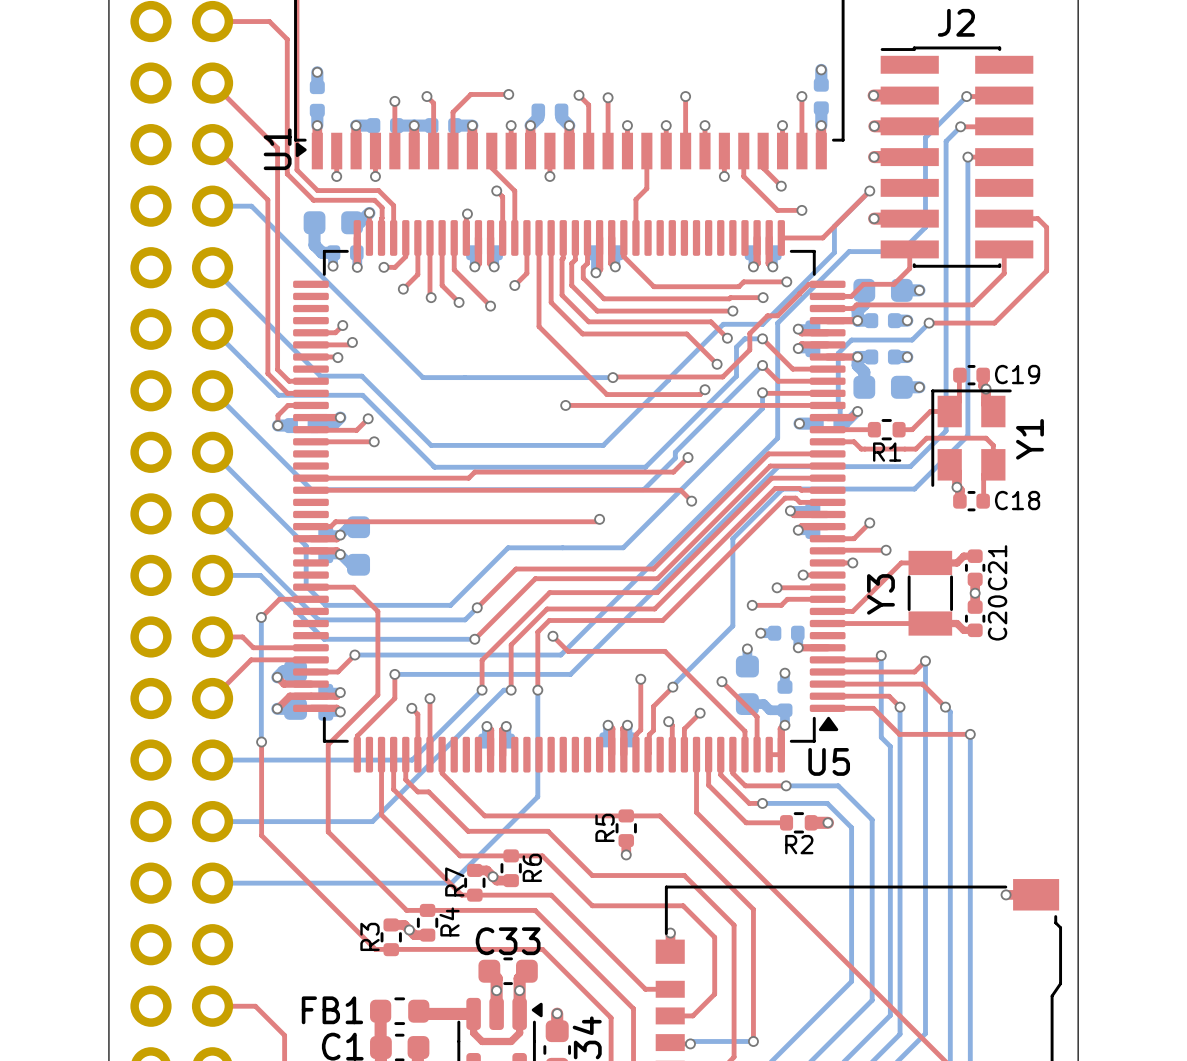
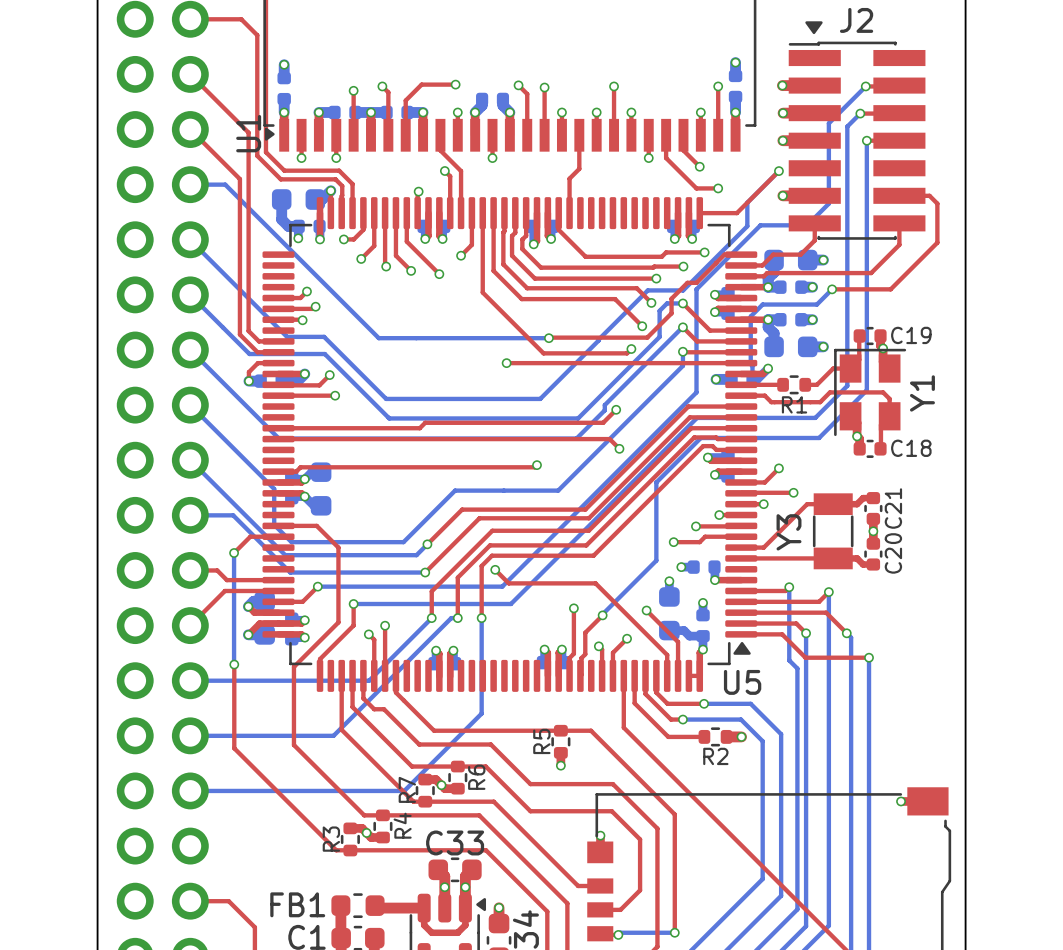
drawing: none -> [805, 21, 823, 35]

